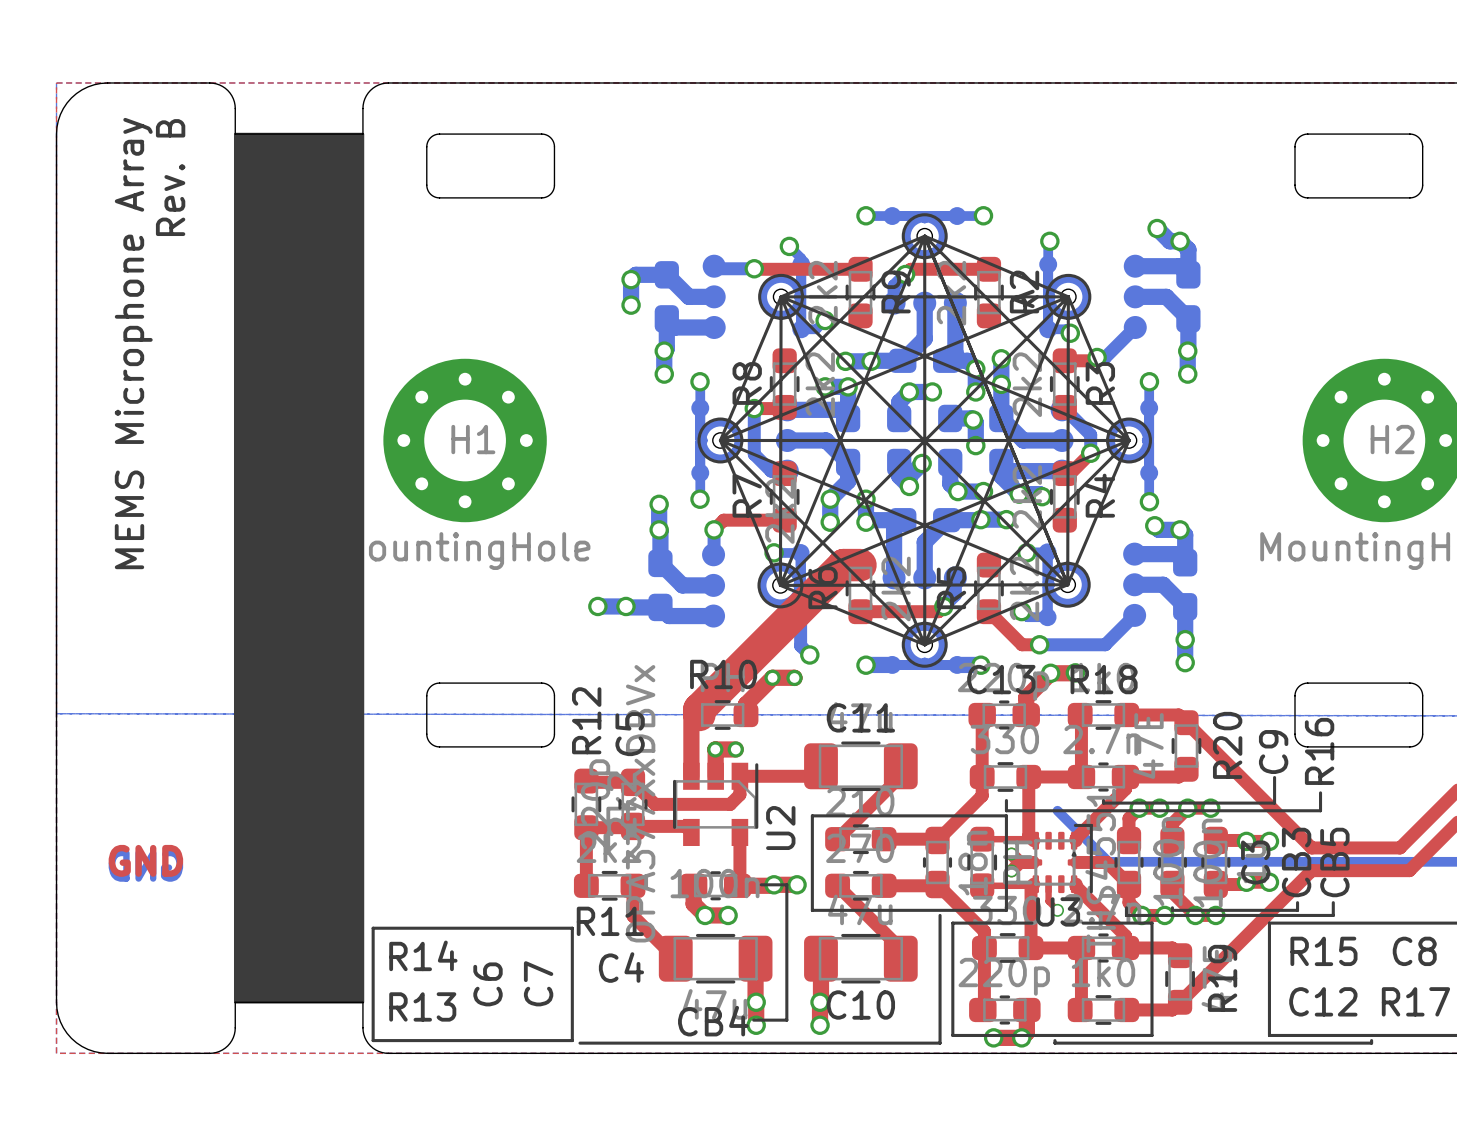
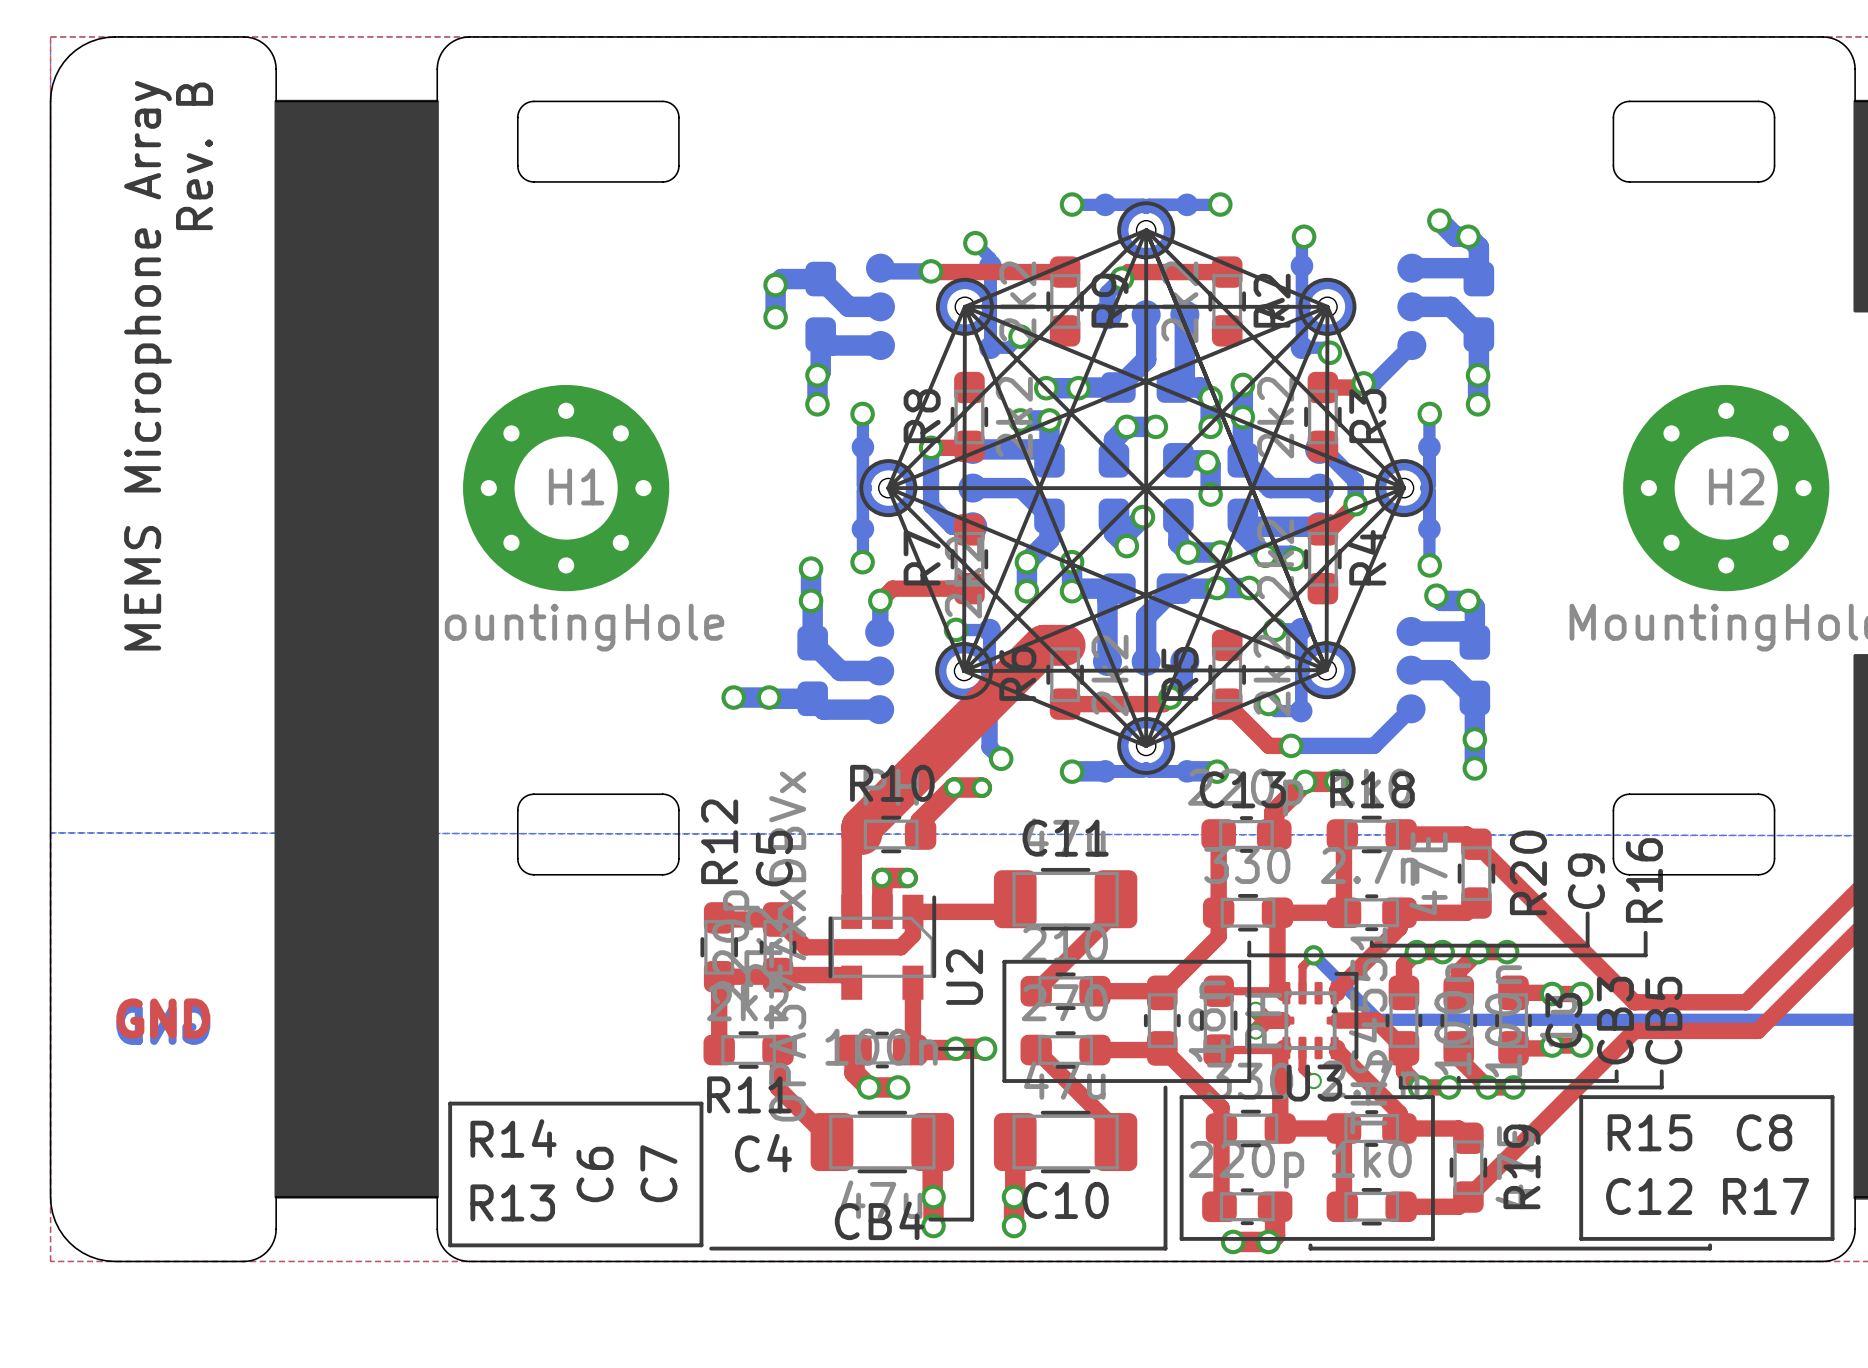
top track: none -> (1313, 955) (1302, 966) (1302, 993)
via: none -> (1313, 955)

